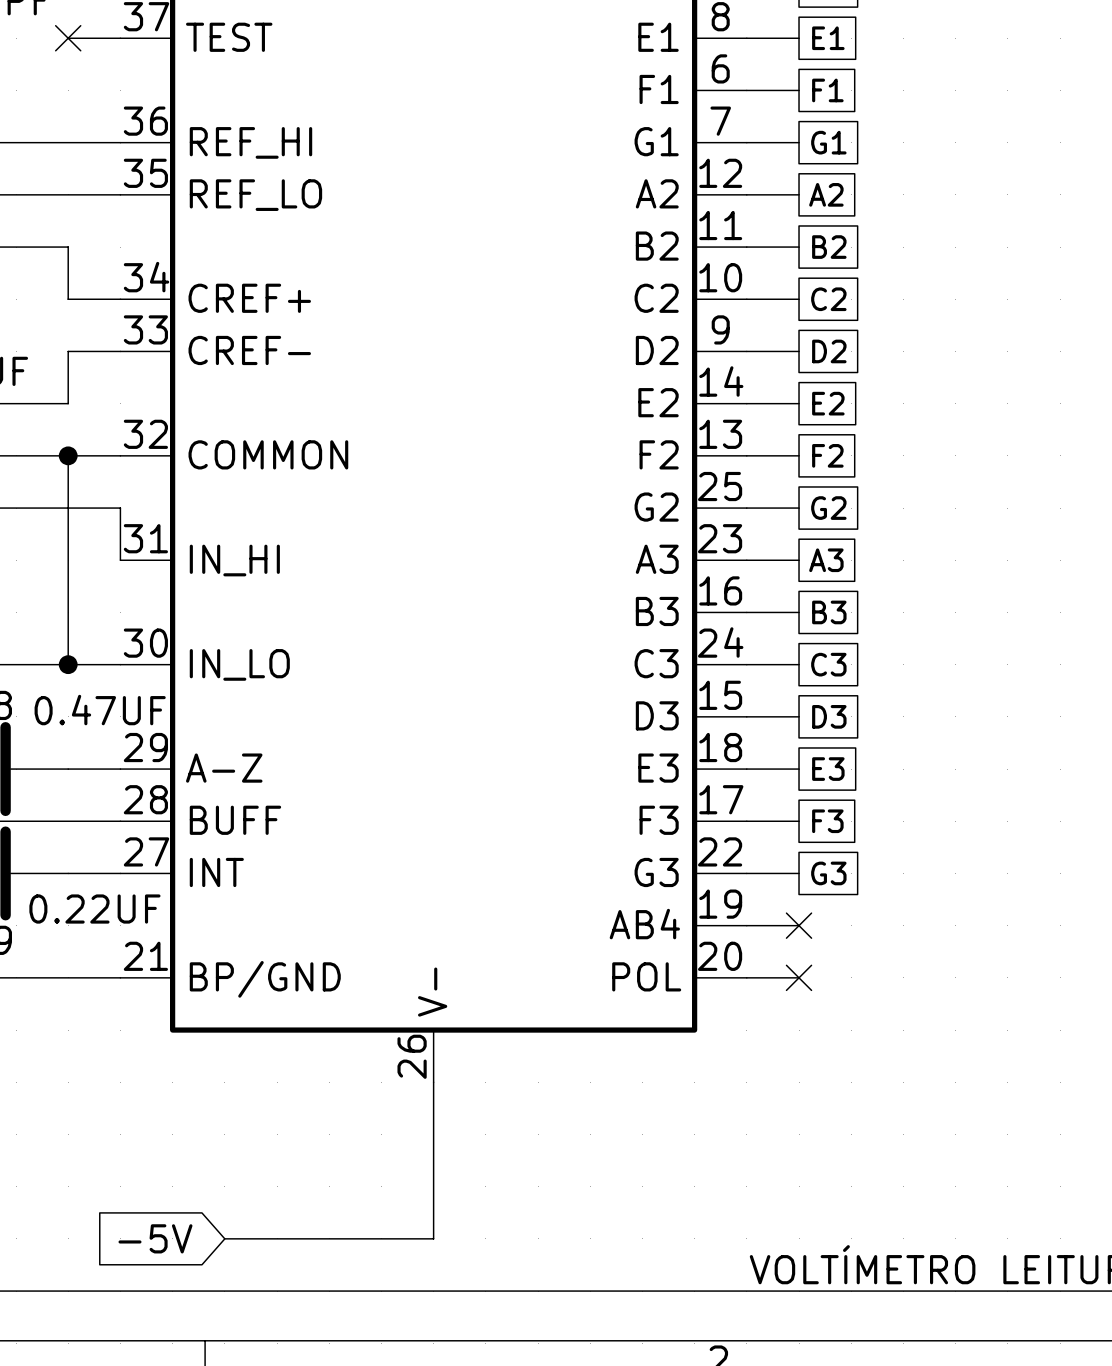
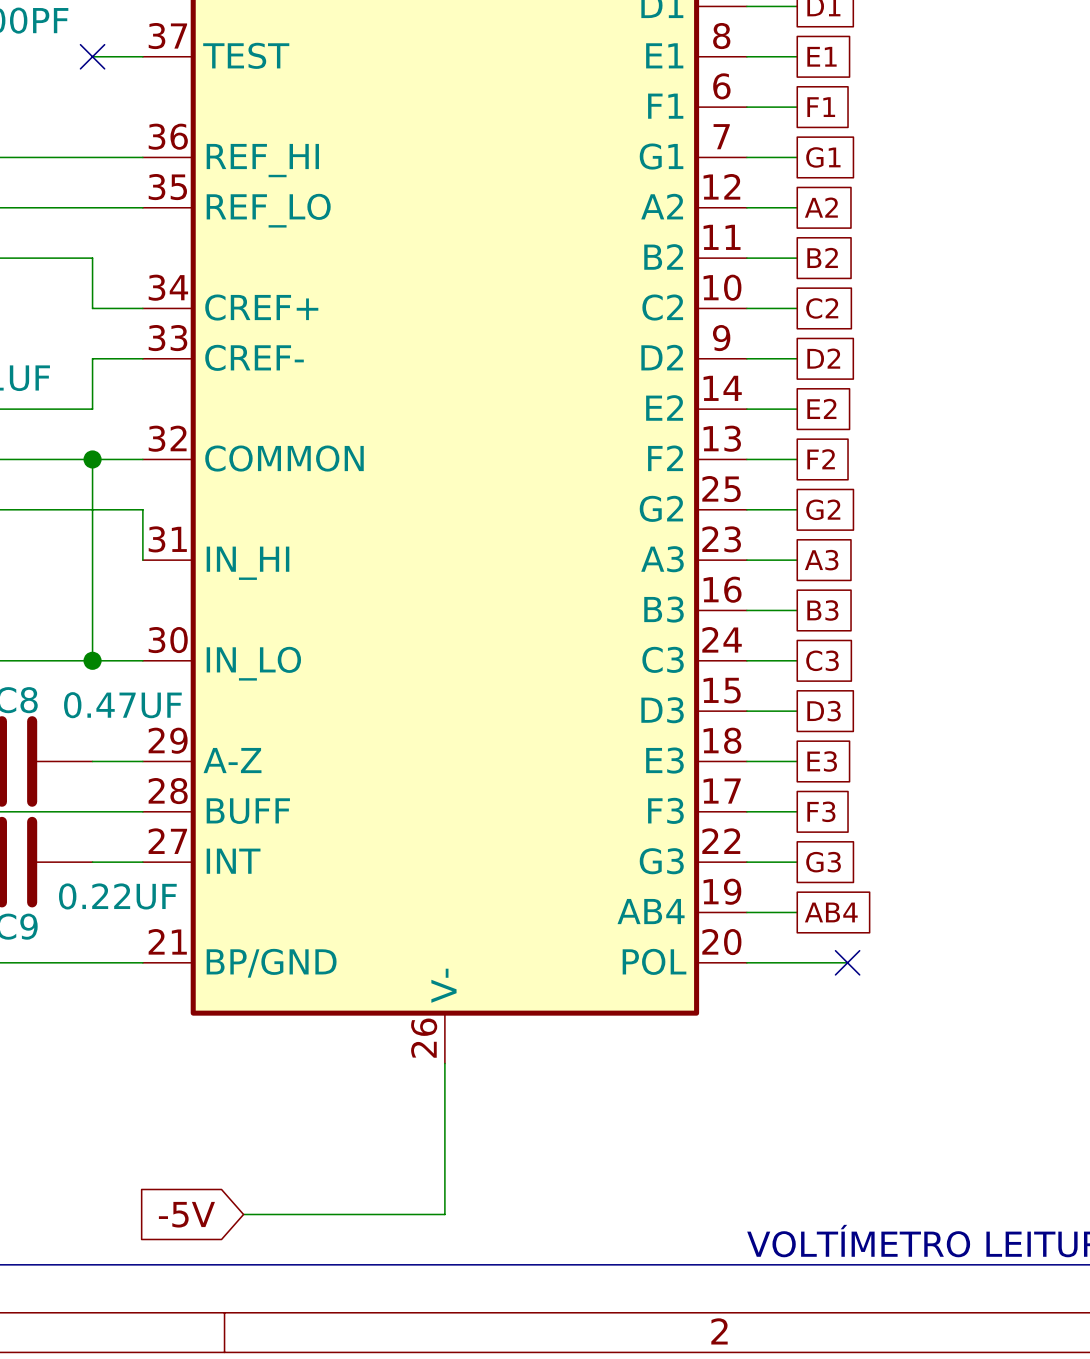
no-connect mark: (799, 925) -> none
global label: none -> AB4 (831, 912)
wire: none -> (797, 962) (847, 962)
no-connect mark: (799, 977) -> none
no-connect mark: none -> (847, 962)

